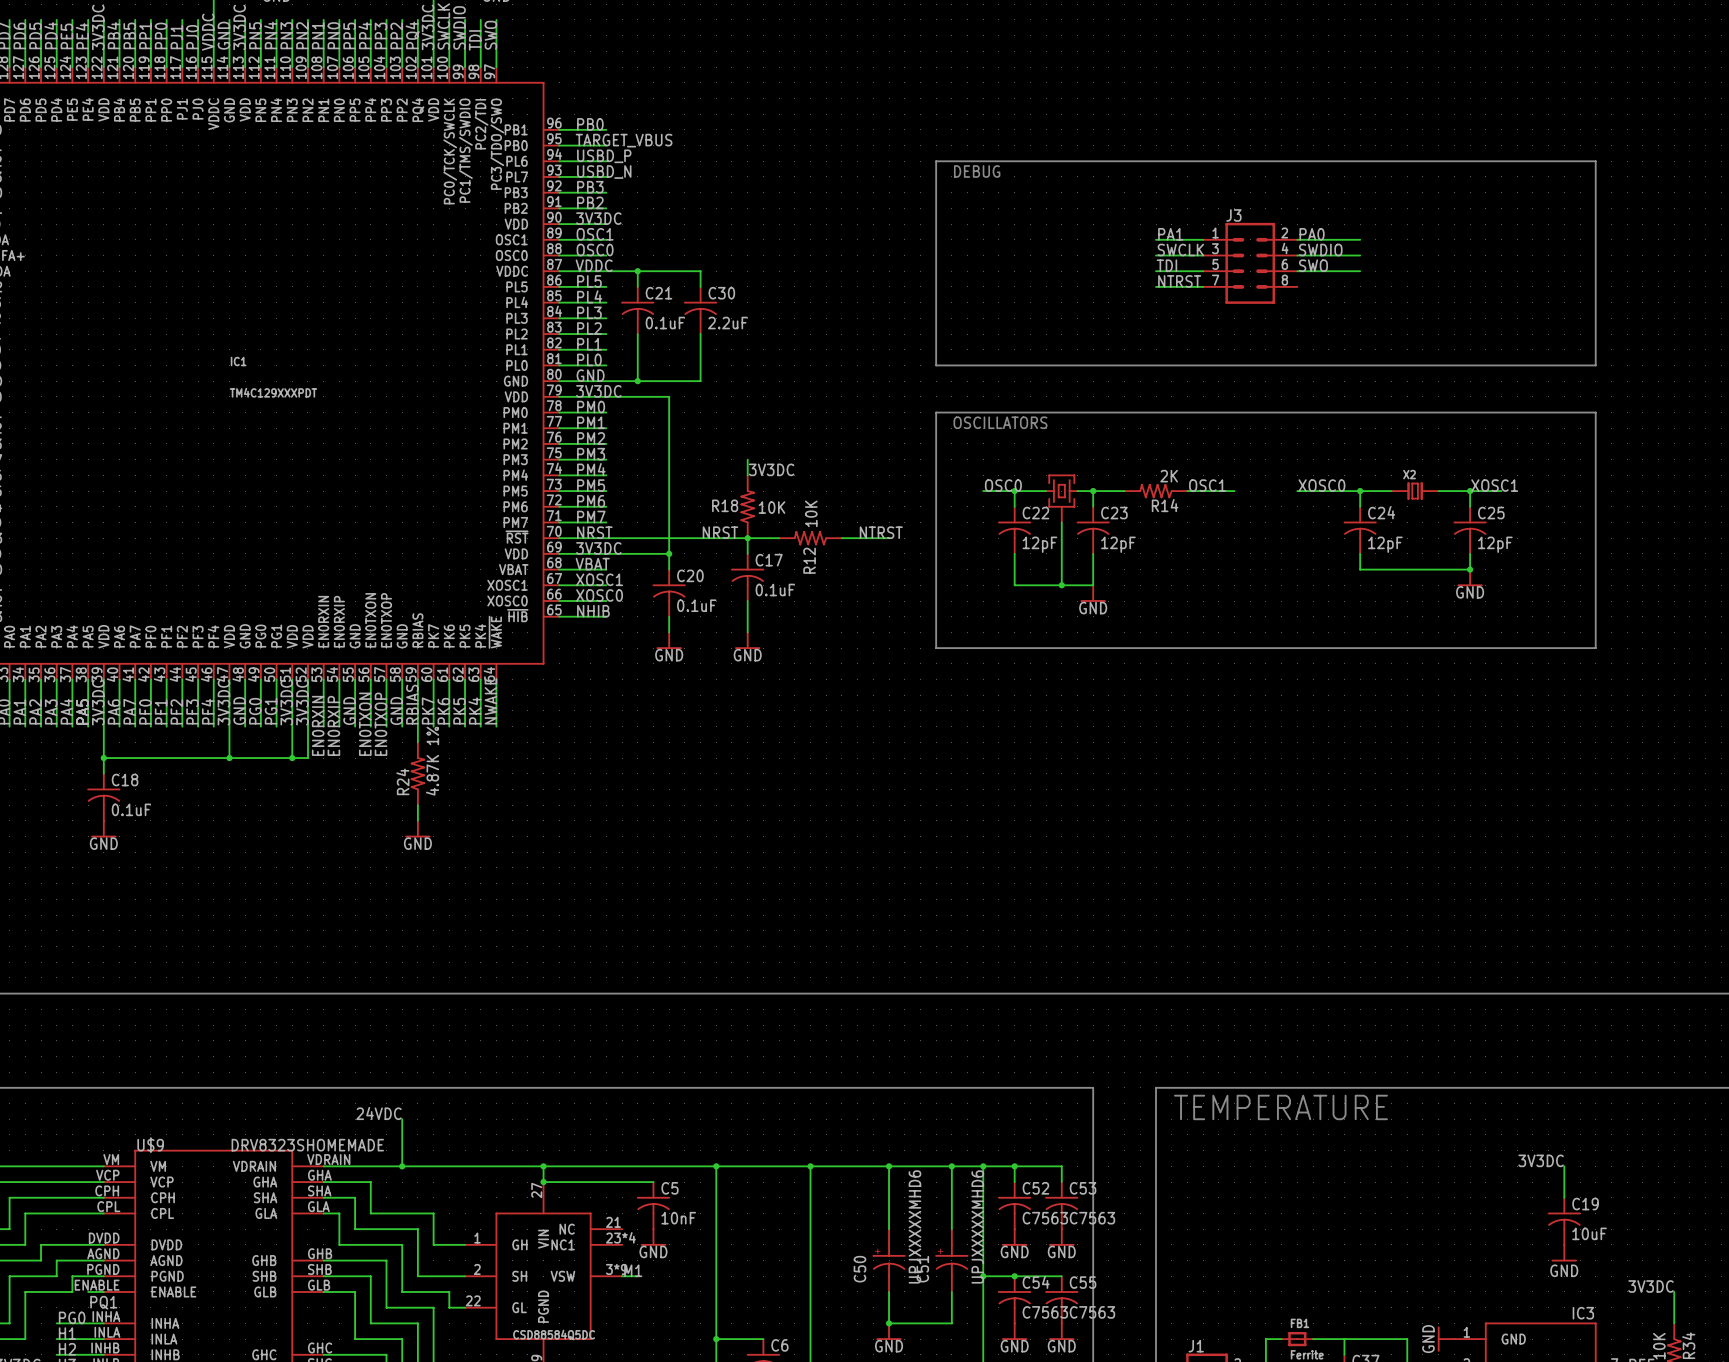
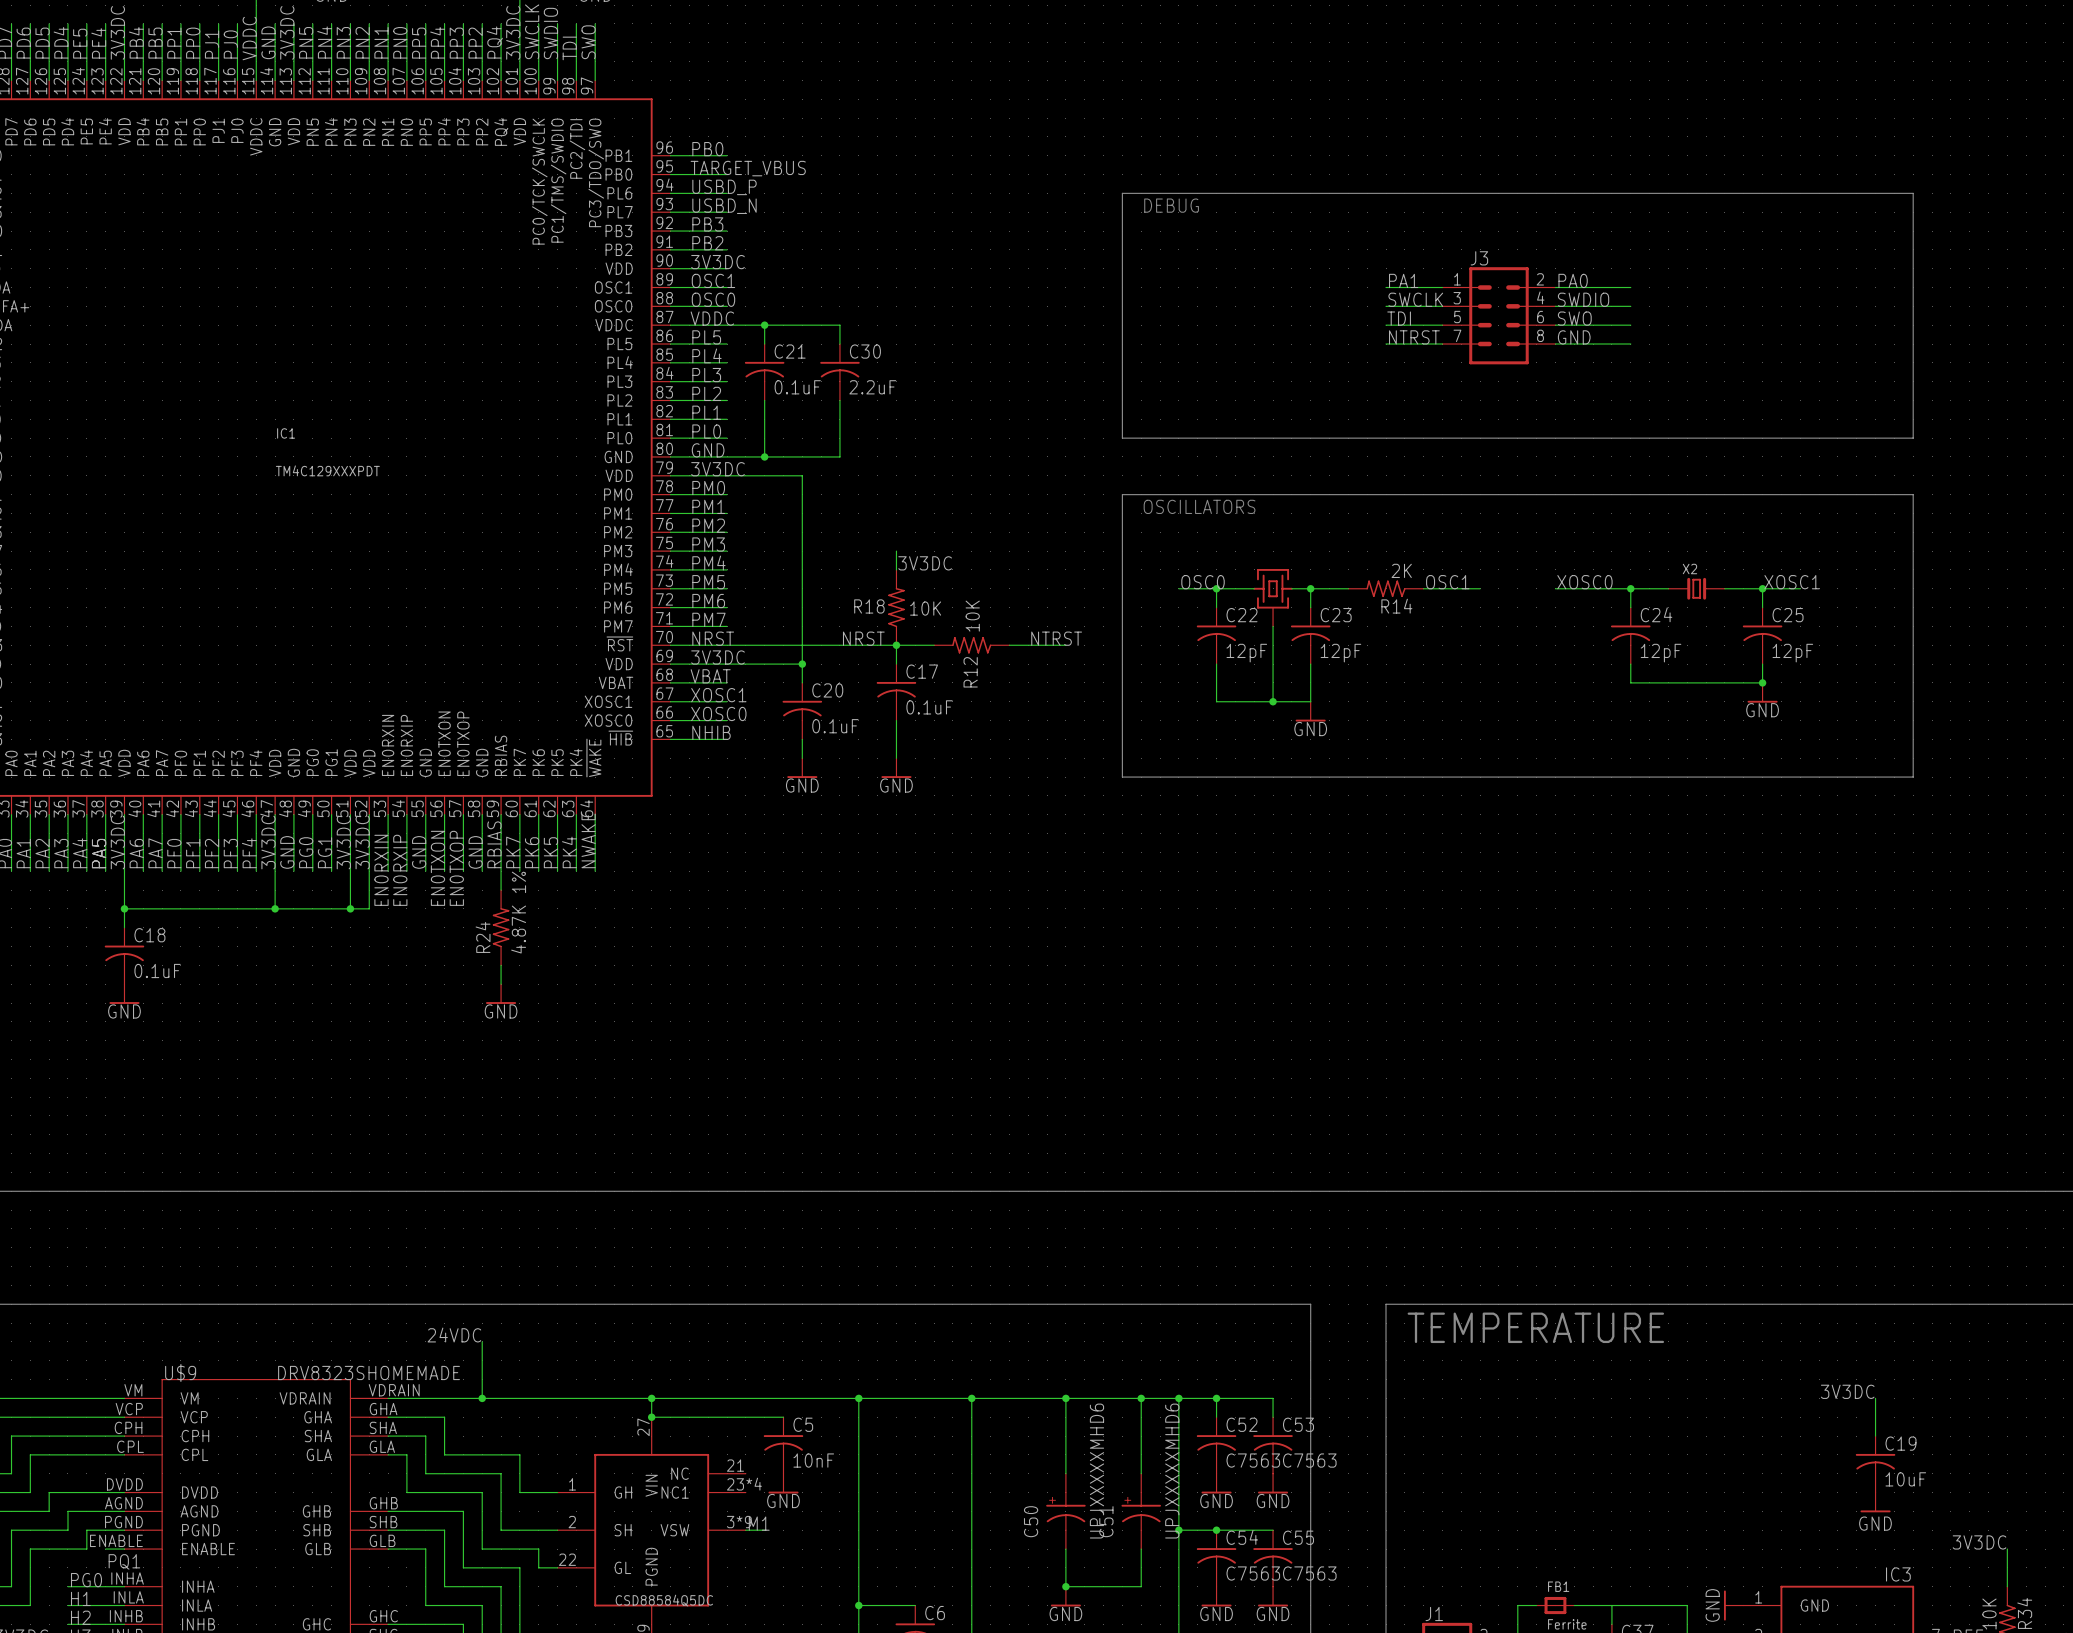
label: none -> GND (1574, 337)
wire: none -> (1555, 344) (1630, 344)

